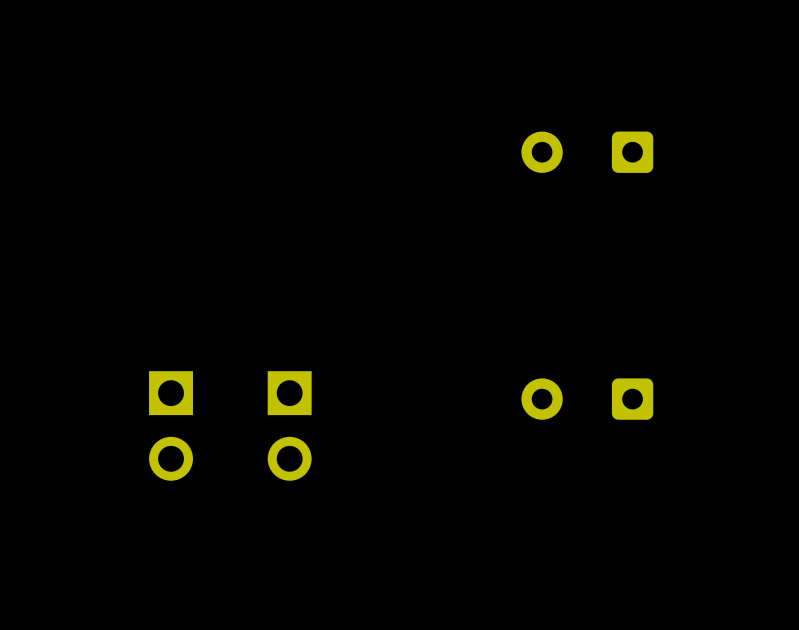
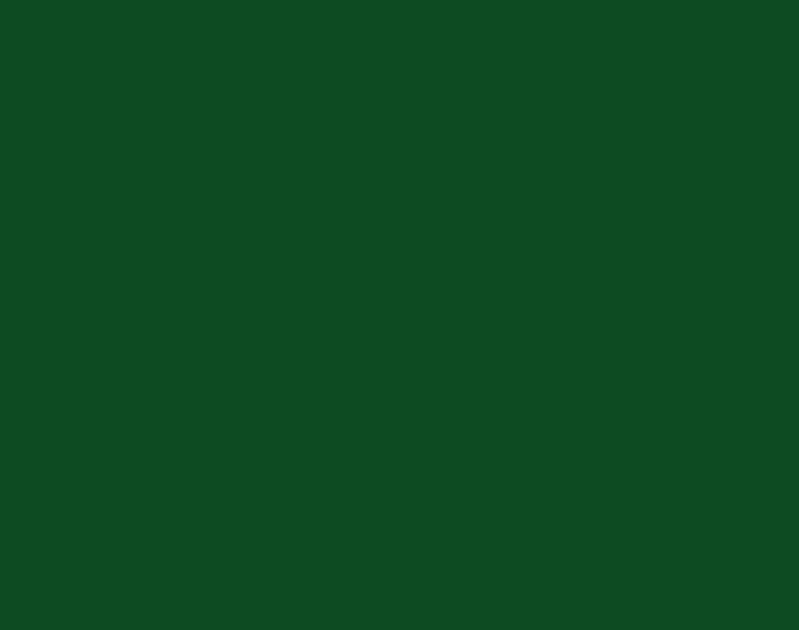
part: (587, 152) -> none
part: (587, 399) -> none
part: (171, 425) -> none
part: (289, 425) -> none

